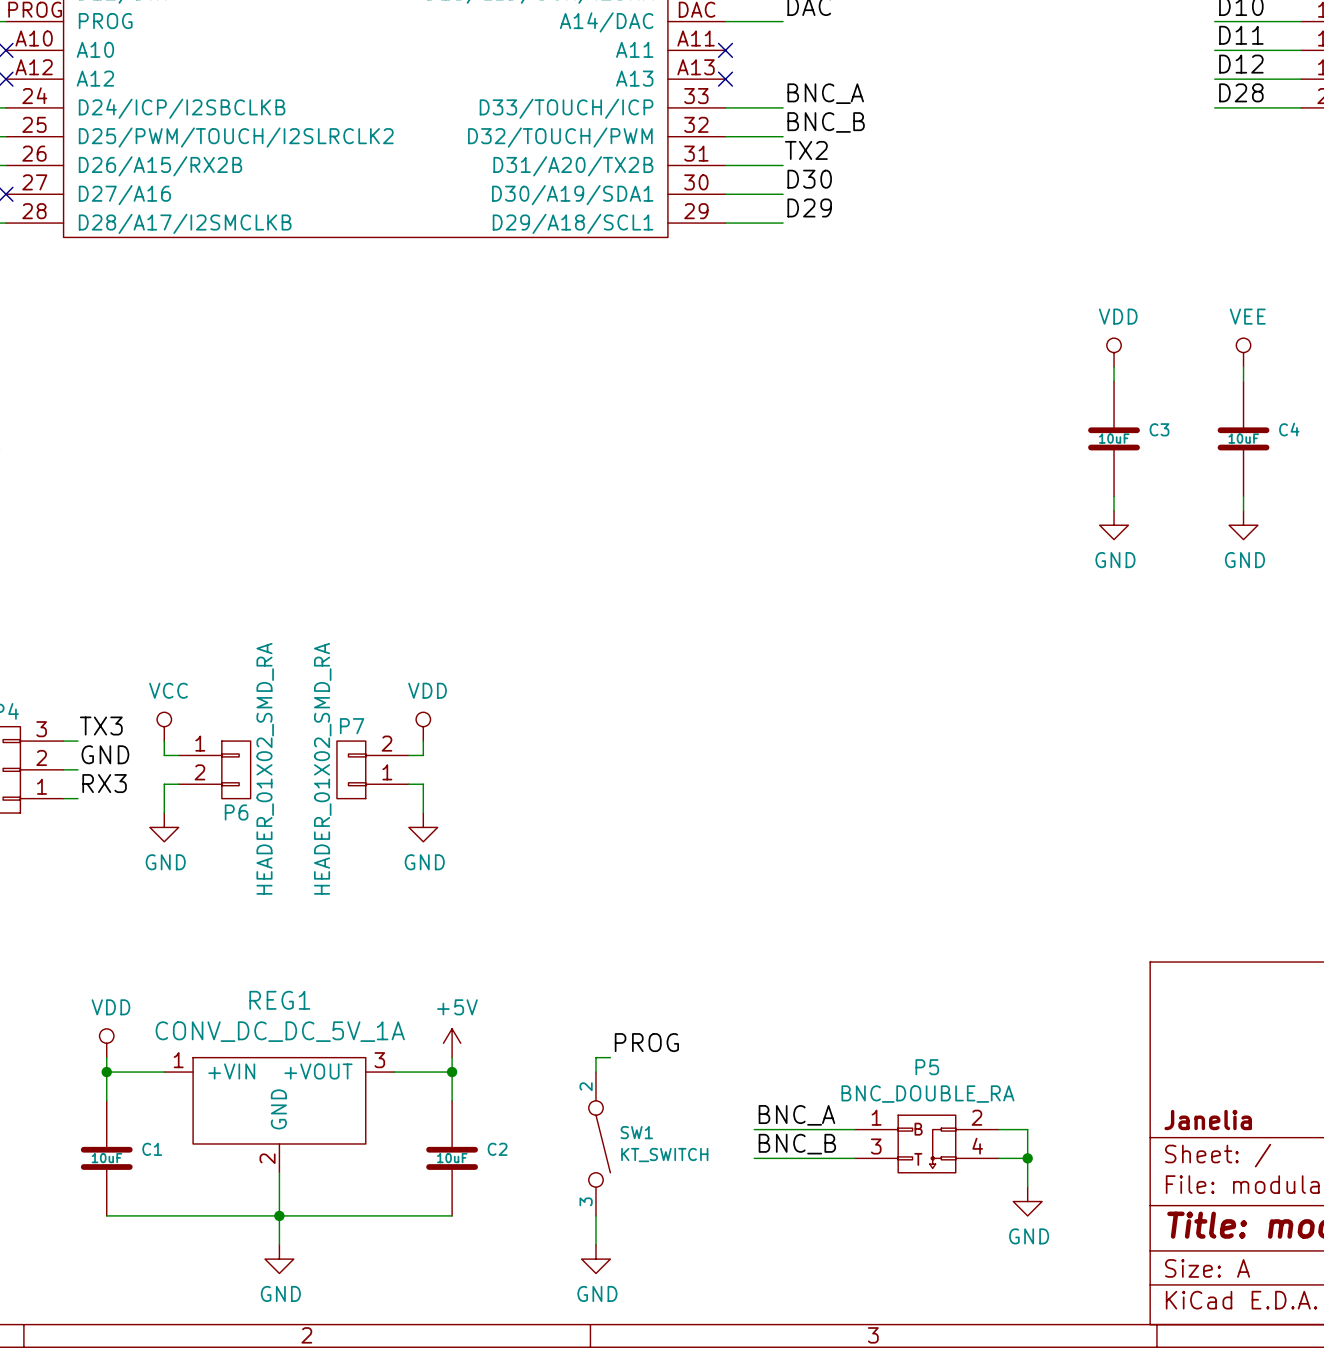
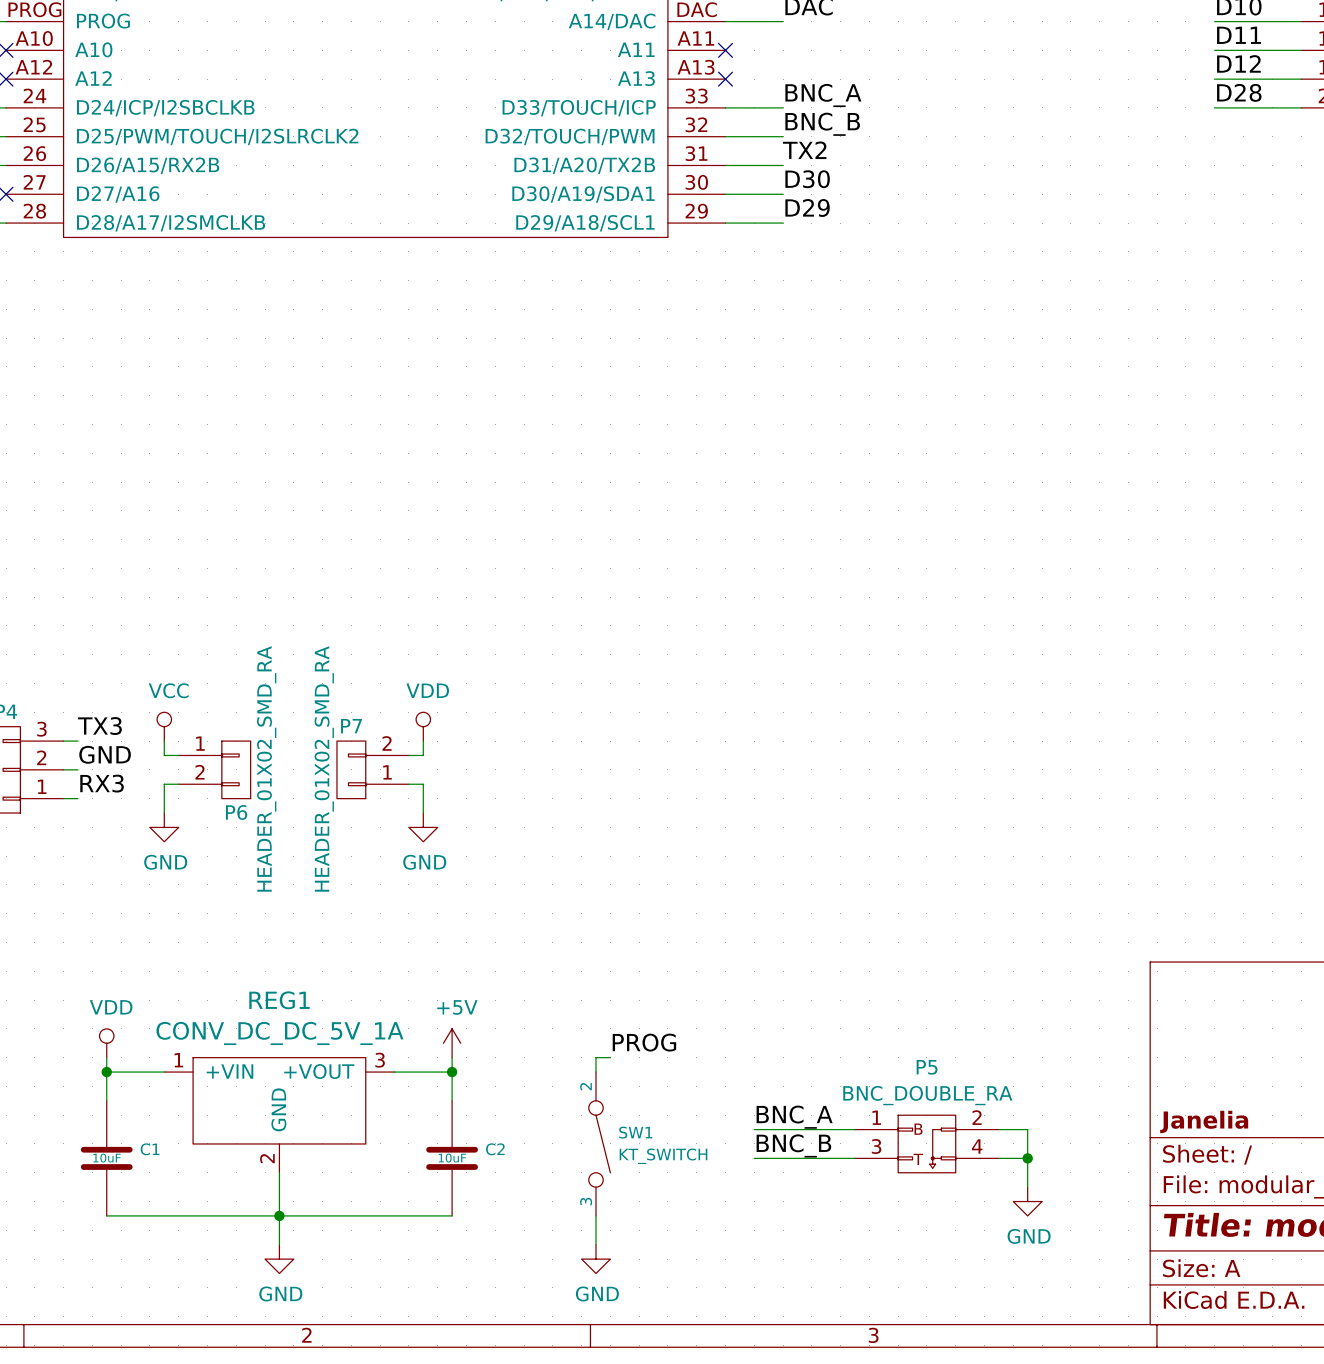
power symbol: VDD (1114, 352) -> none
power symbol: VEE (1243, 352) -> none
wire: (1114, 366) (1114, 381) -> none
wire: (1243, 366) (1243, 381) -> none
C3: 10uF (1114, 438) -> none
C4: 10uF (1243, 438) -> none
wire: (1114, 496) (1114, 510) -> none
wire: (1243, 496) (1243, 510) -> none
power symbol: GND (1114, 525) -> none
power symbol: GND (1243, 525) -> none

